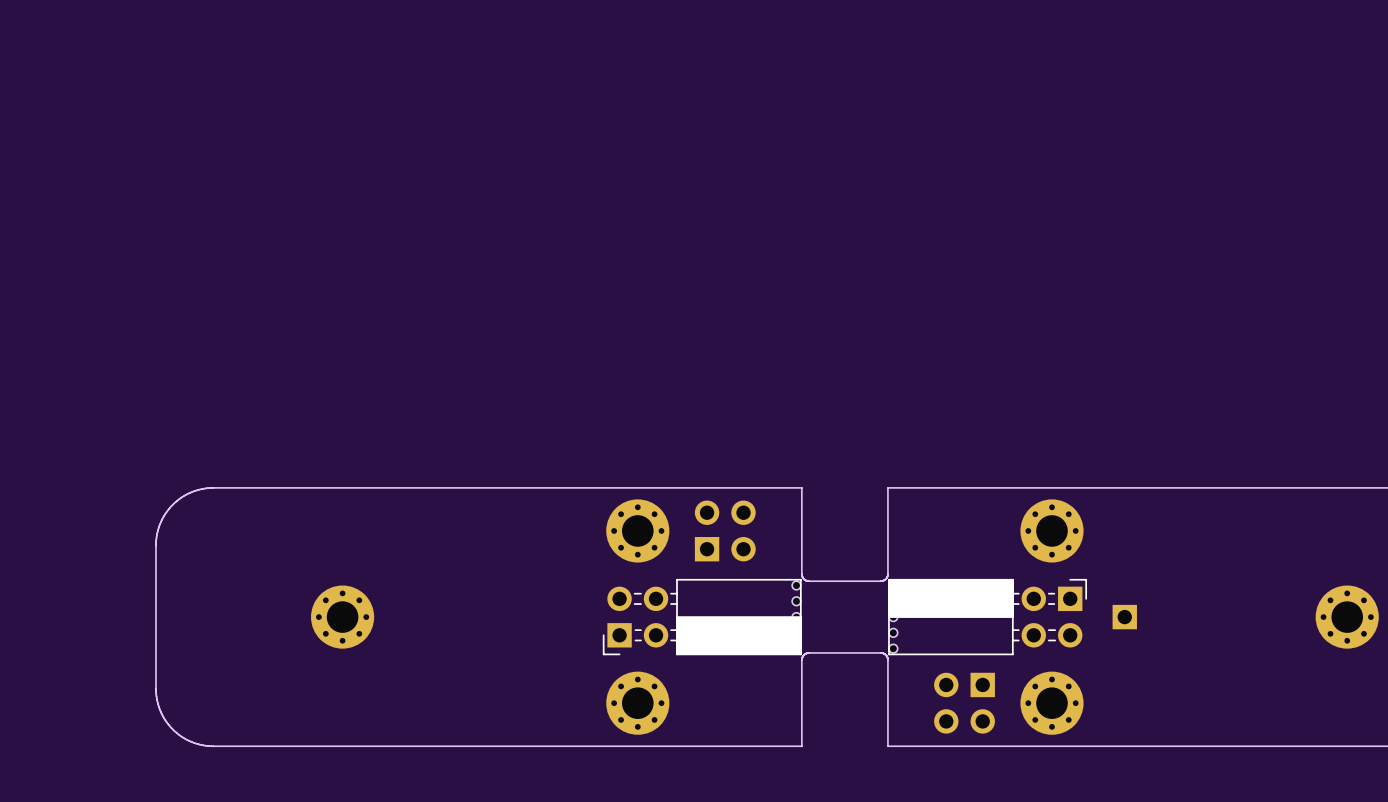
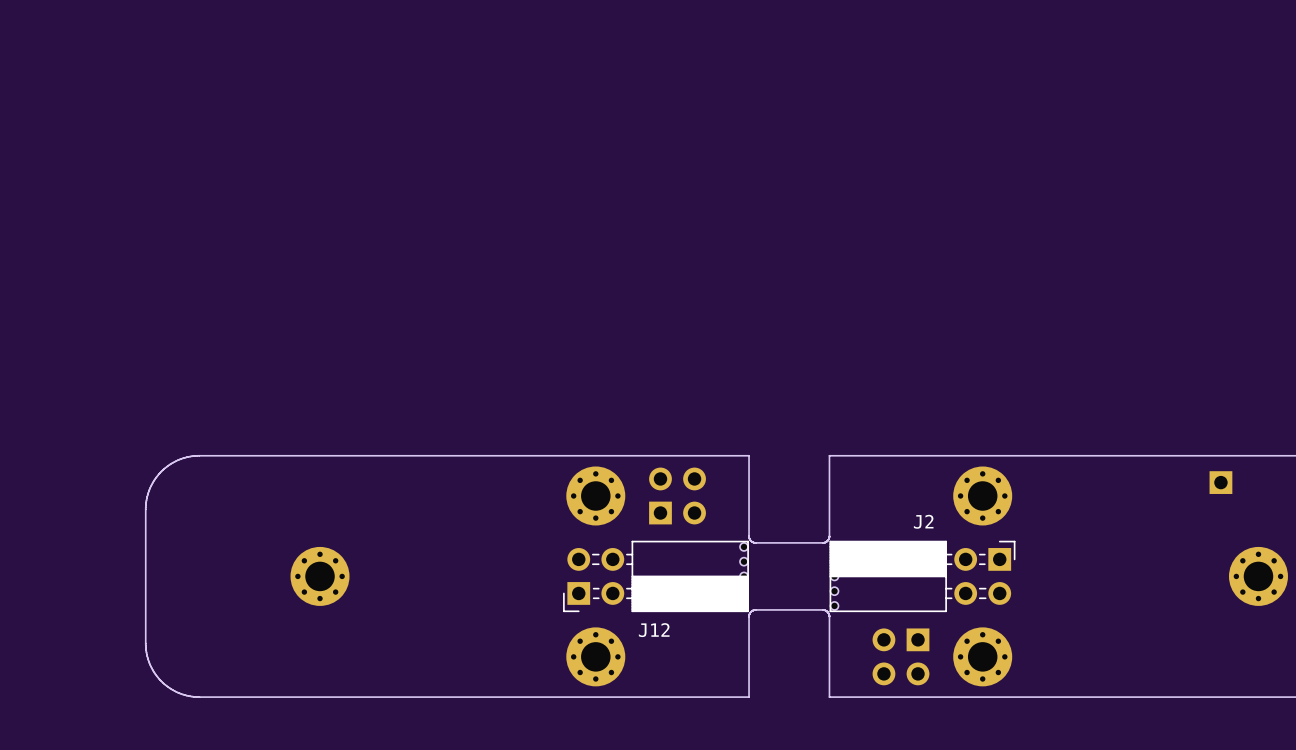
J2 name: none -> J2 (923, 521)
part position: (1124, 617) -> (1220, 482)
J12 name: none -> J12 (654, 630)

